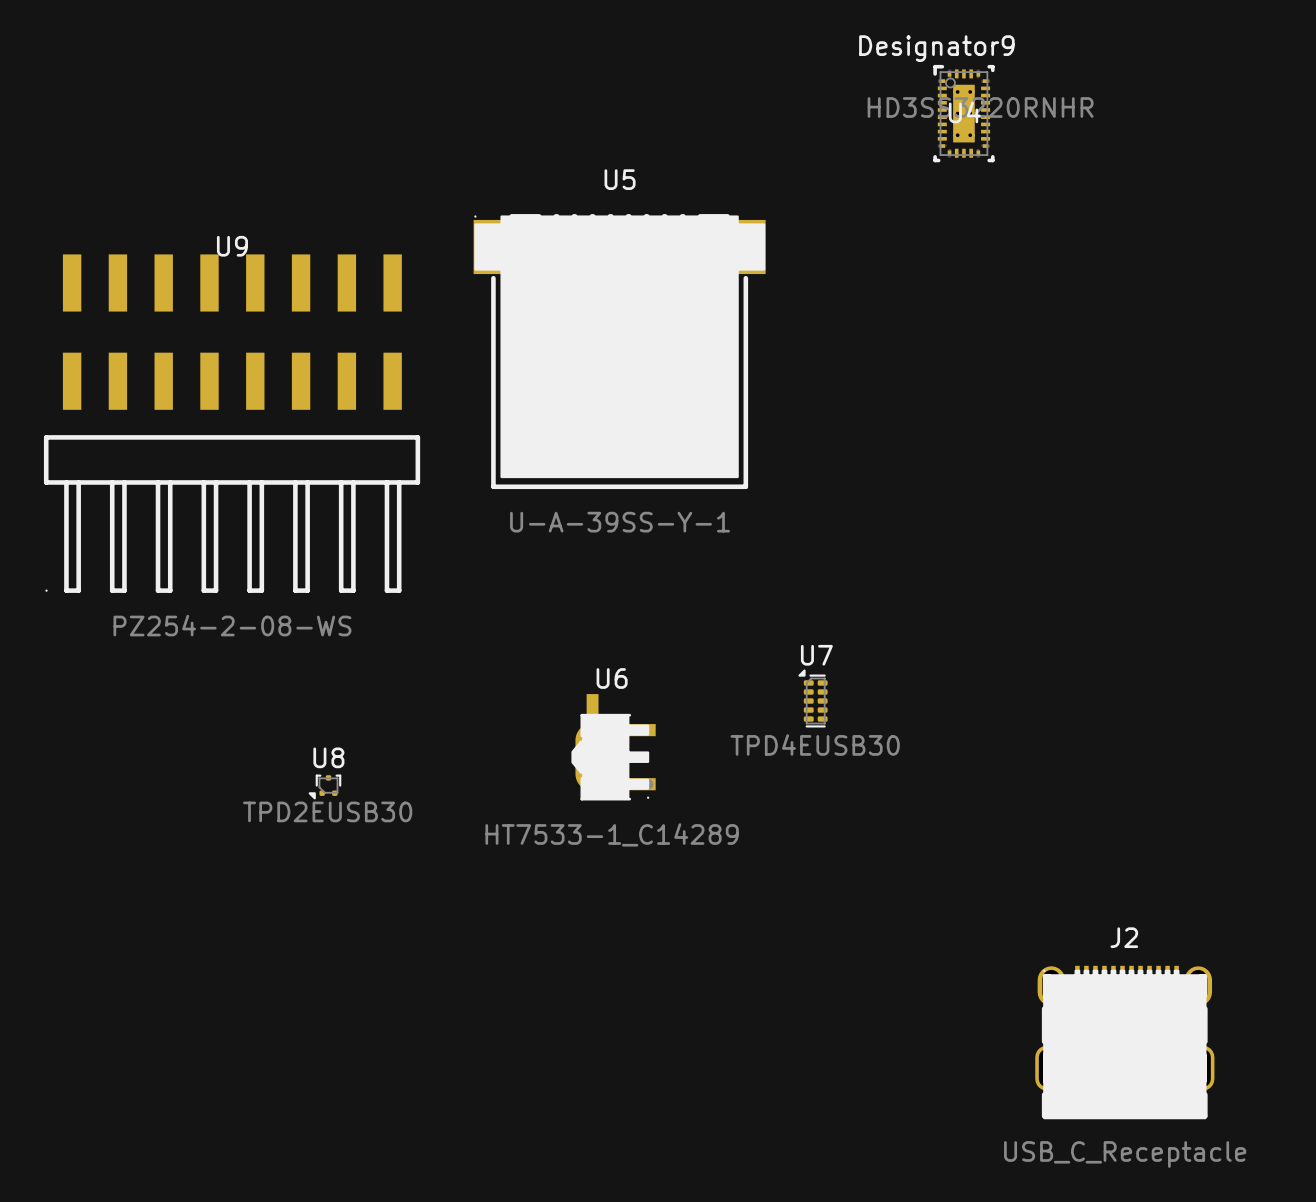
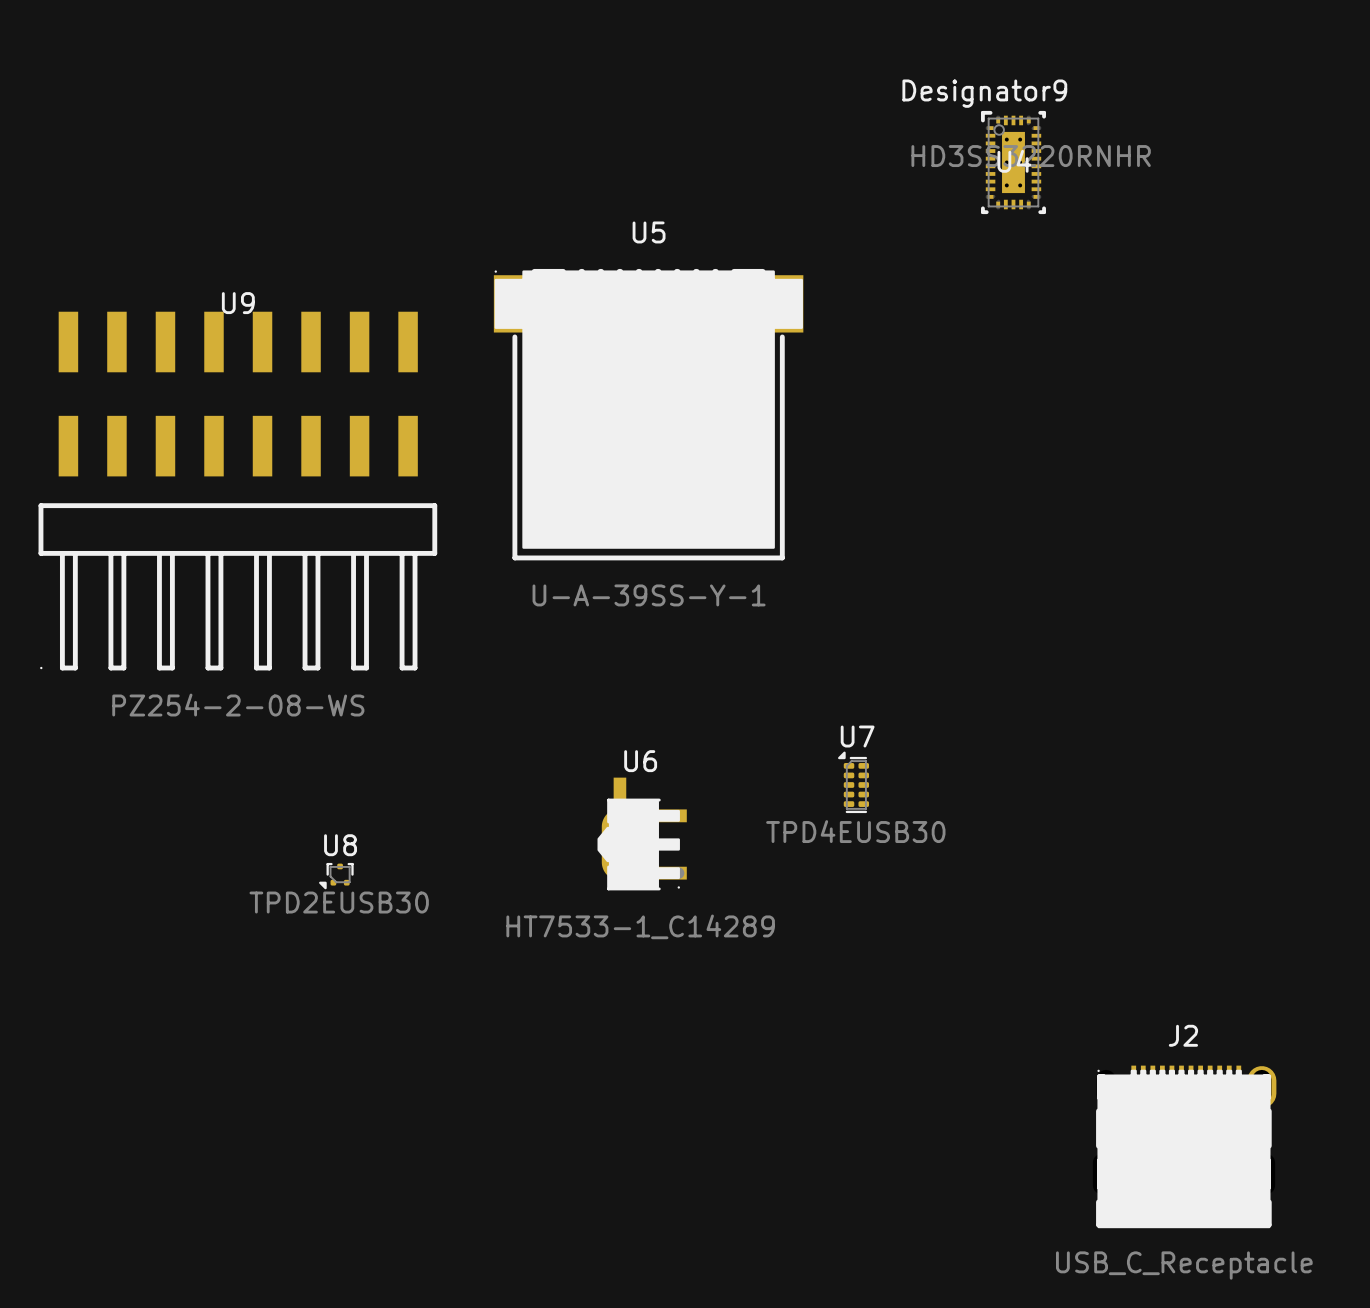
J2 footprint: [1035, 965, 1215, 1120] -> [1092, 1065, 1277, 1229]

